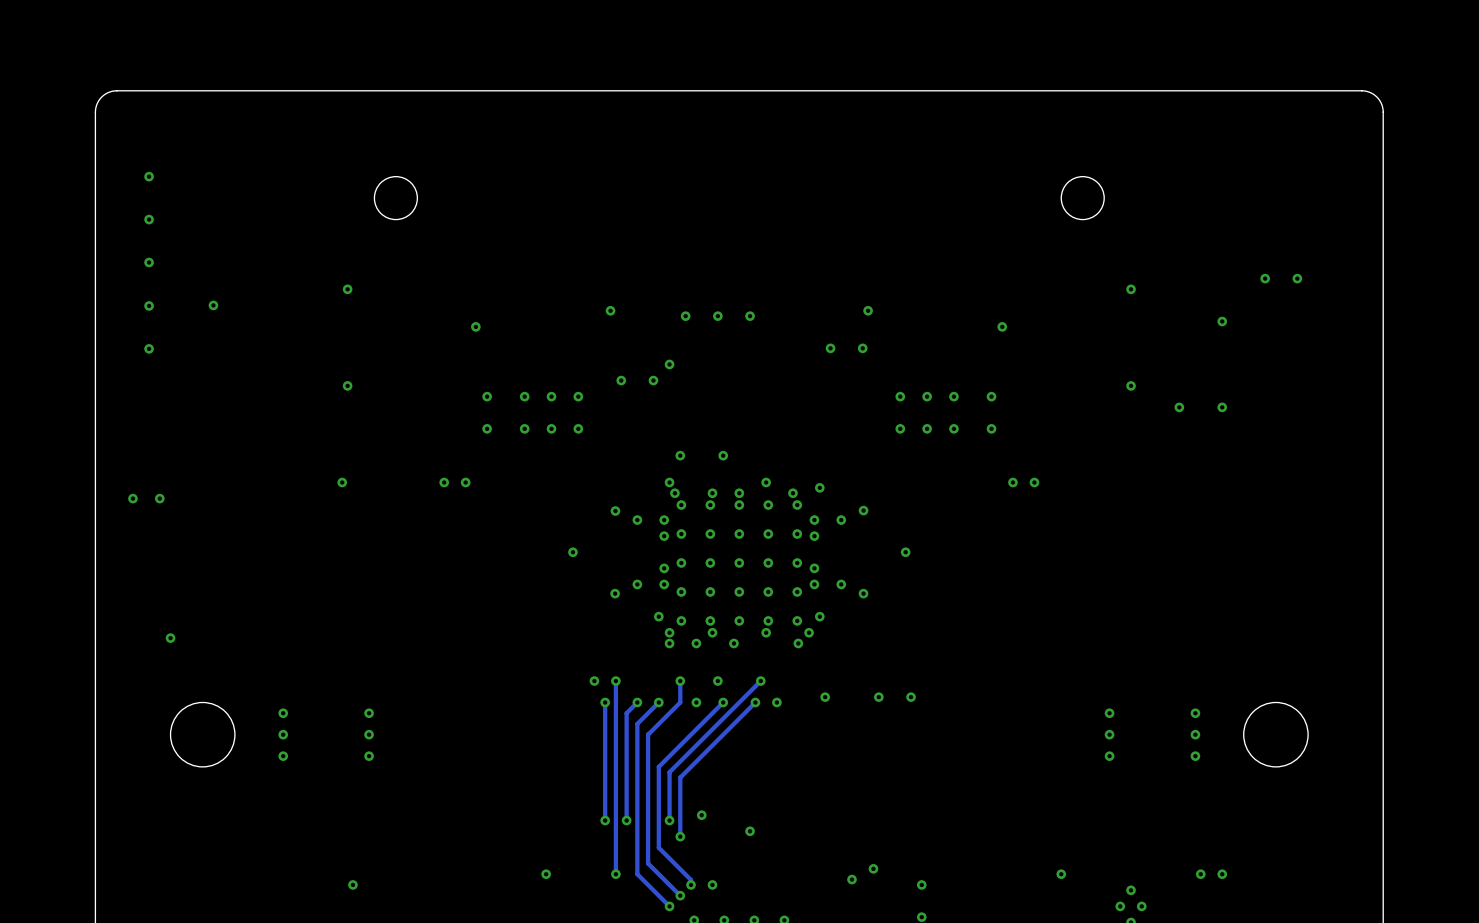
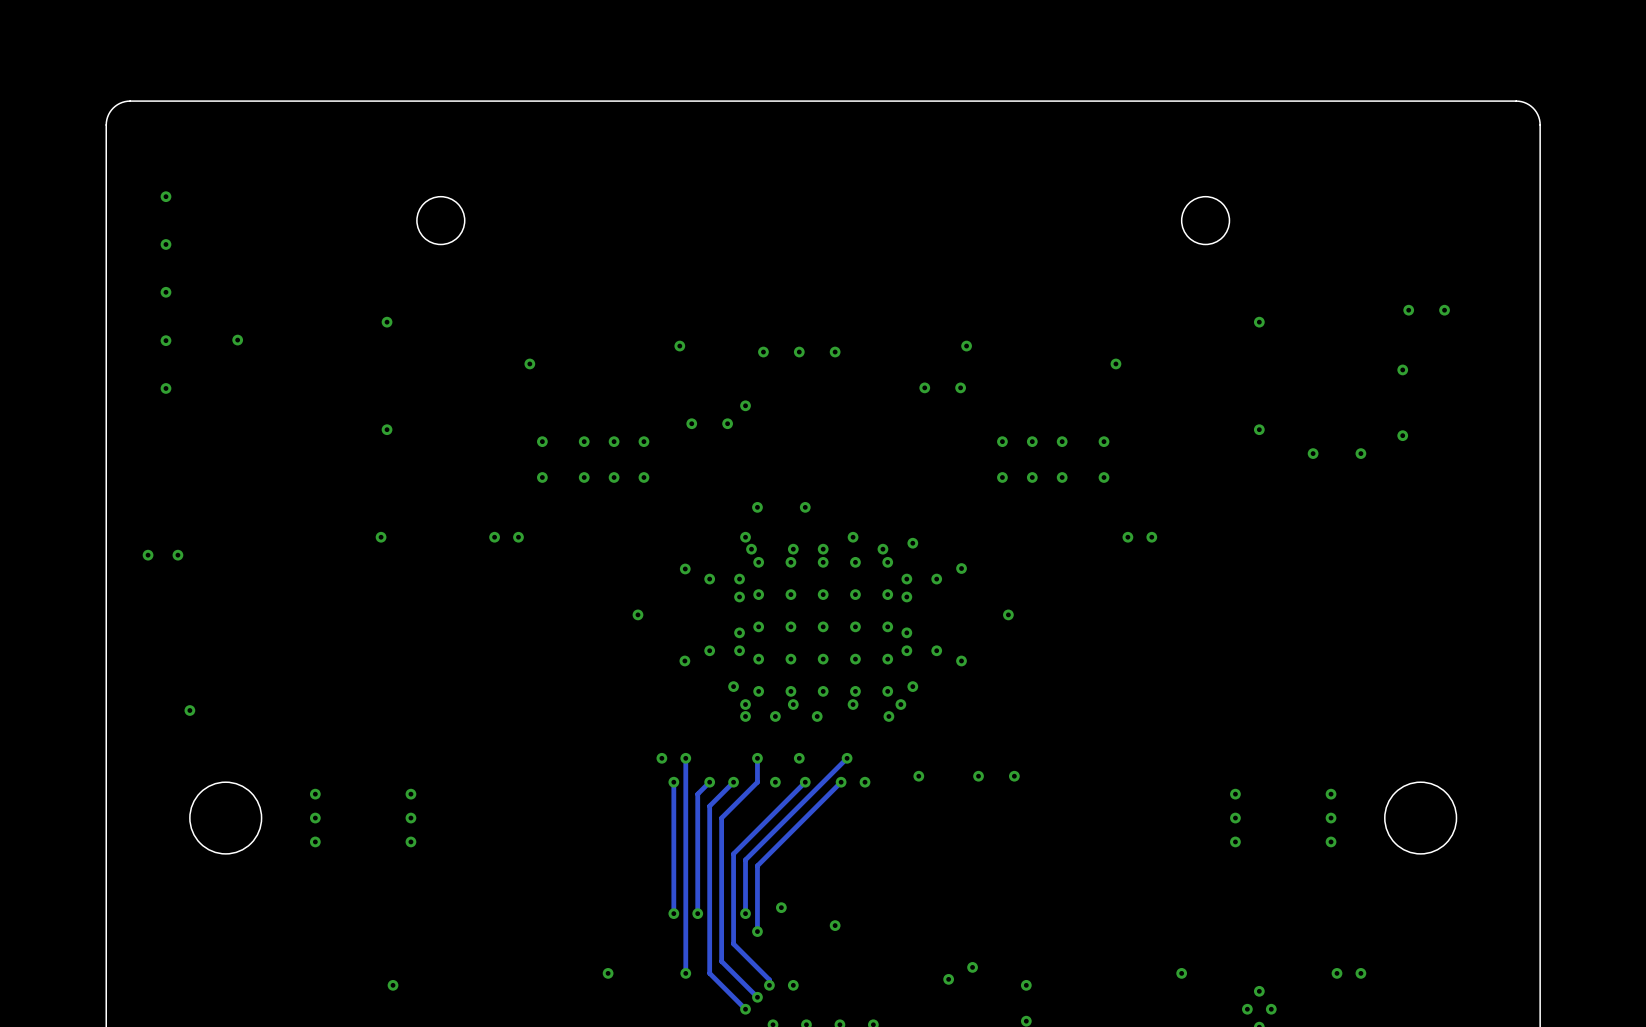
via position: (1222, 321) -> (1402, 369)
via: none -> (1402, 435)

